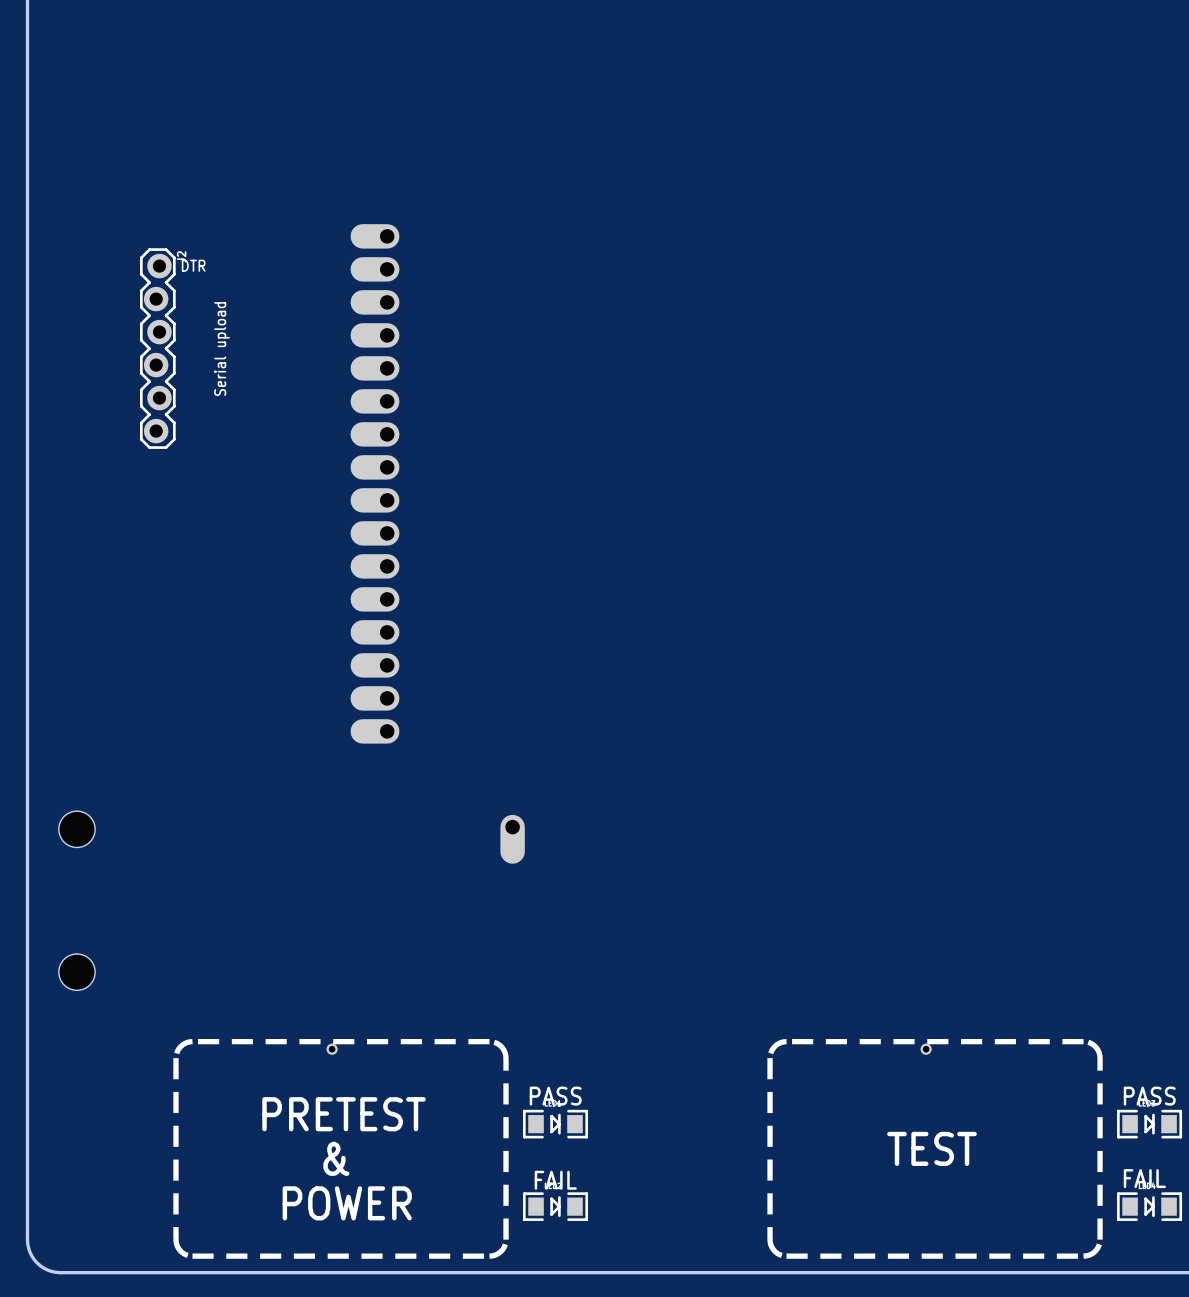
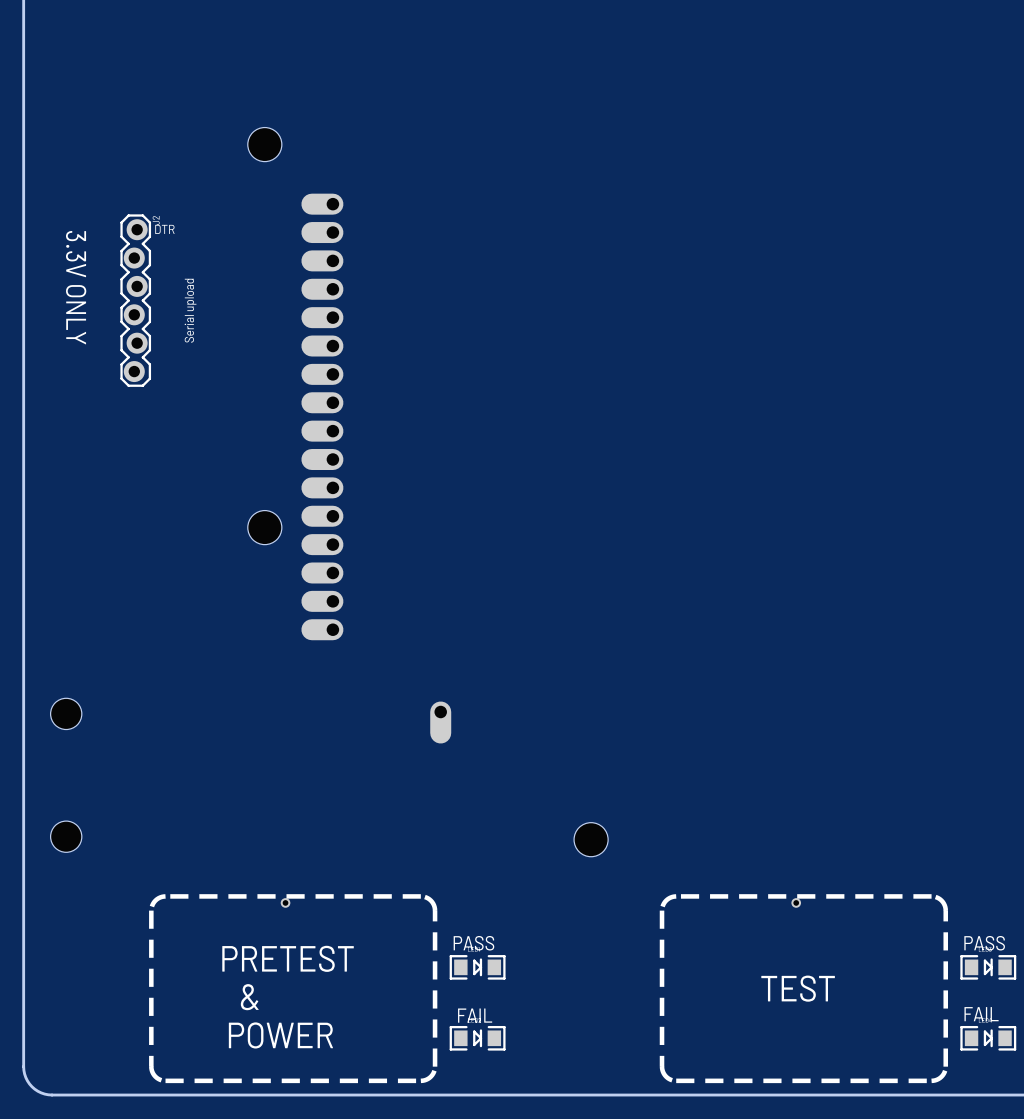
part: none -> (264, 144)
text: none -> 3.3V ONLY (76, 287)
part: none -> (264, 527)
part: none -> (591, 839)

